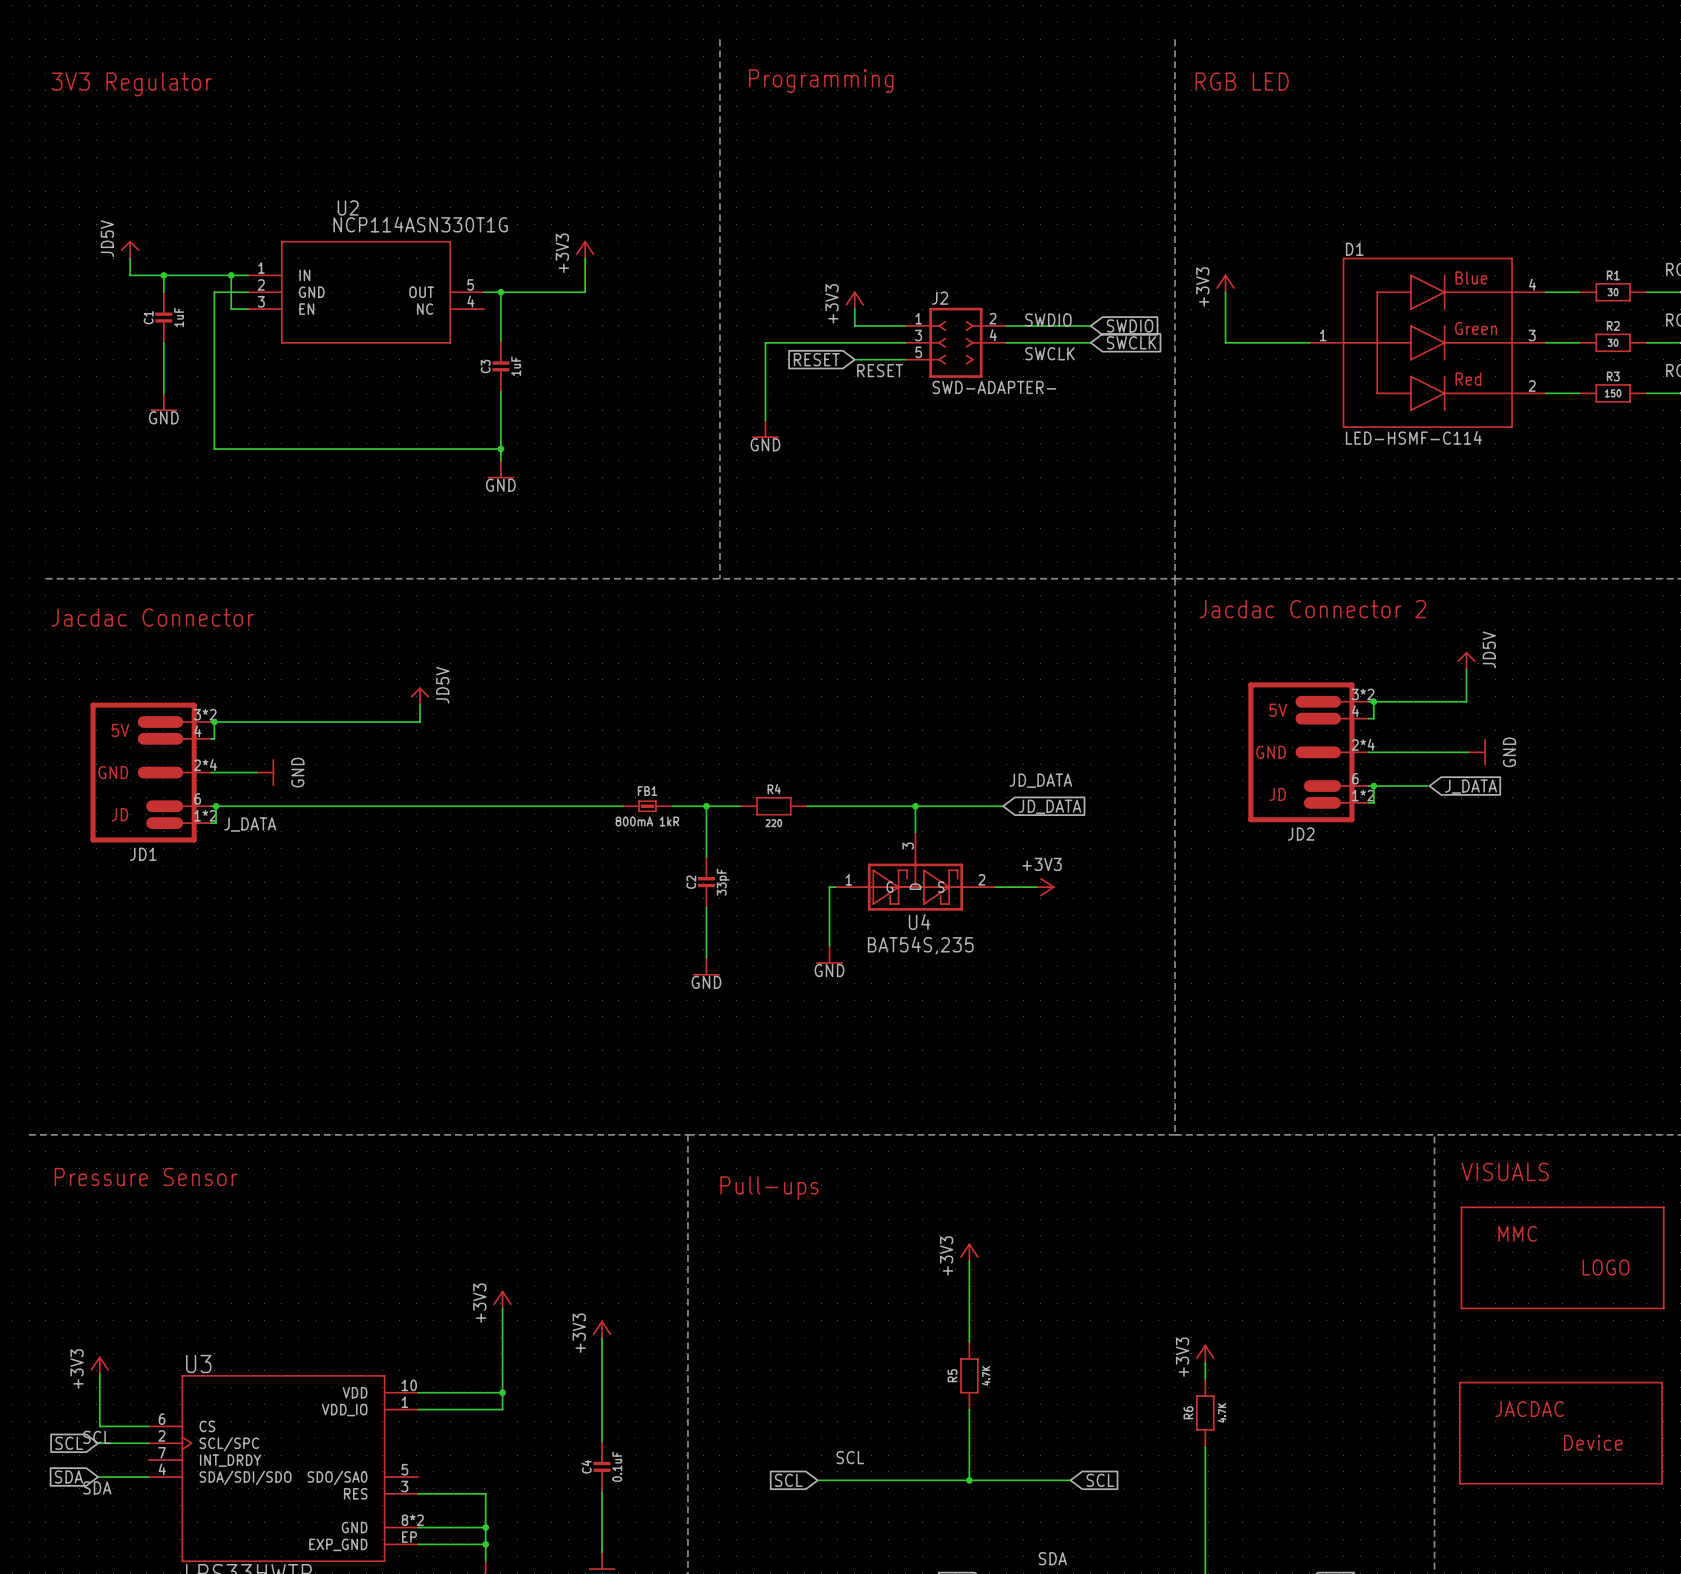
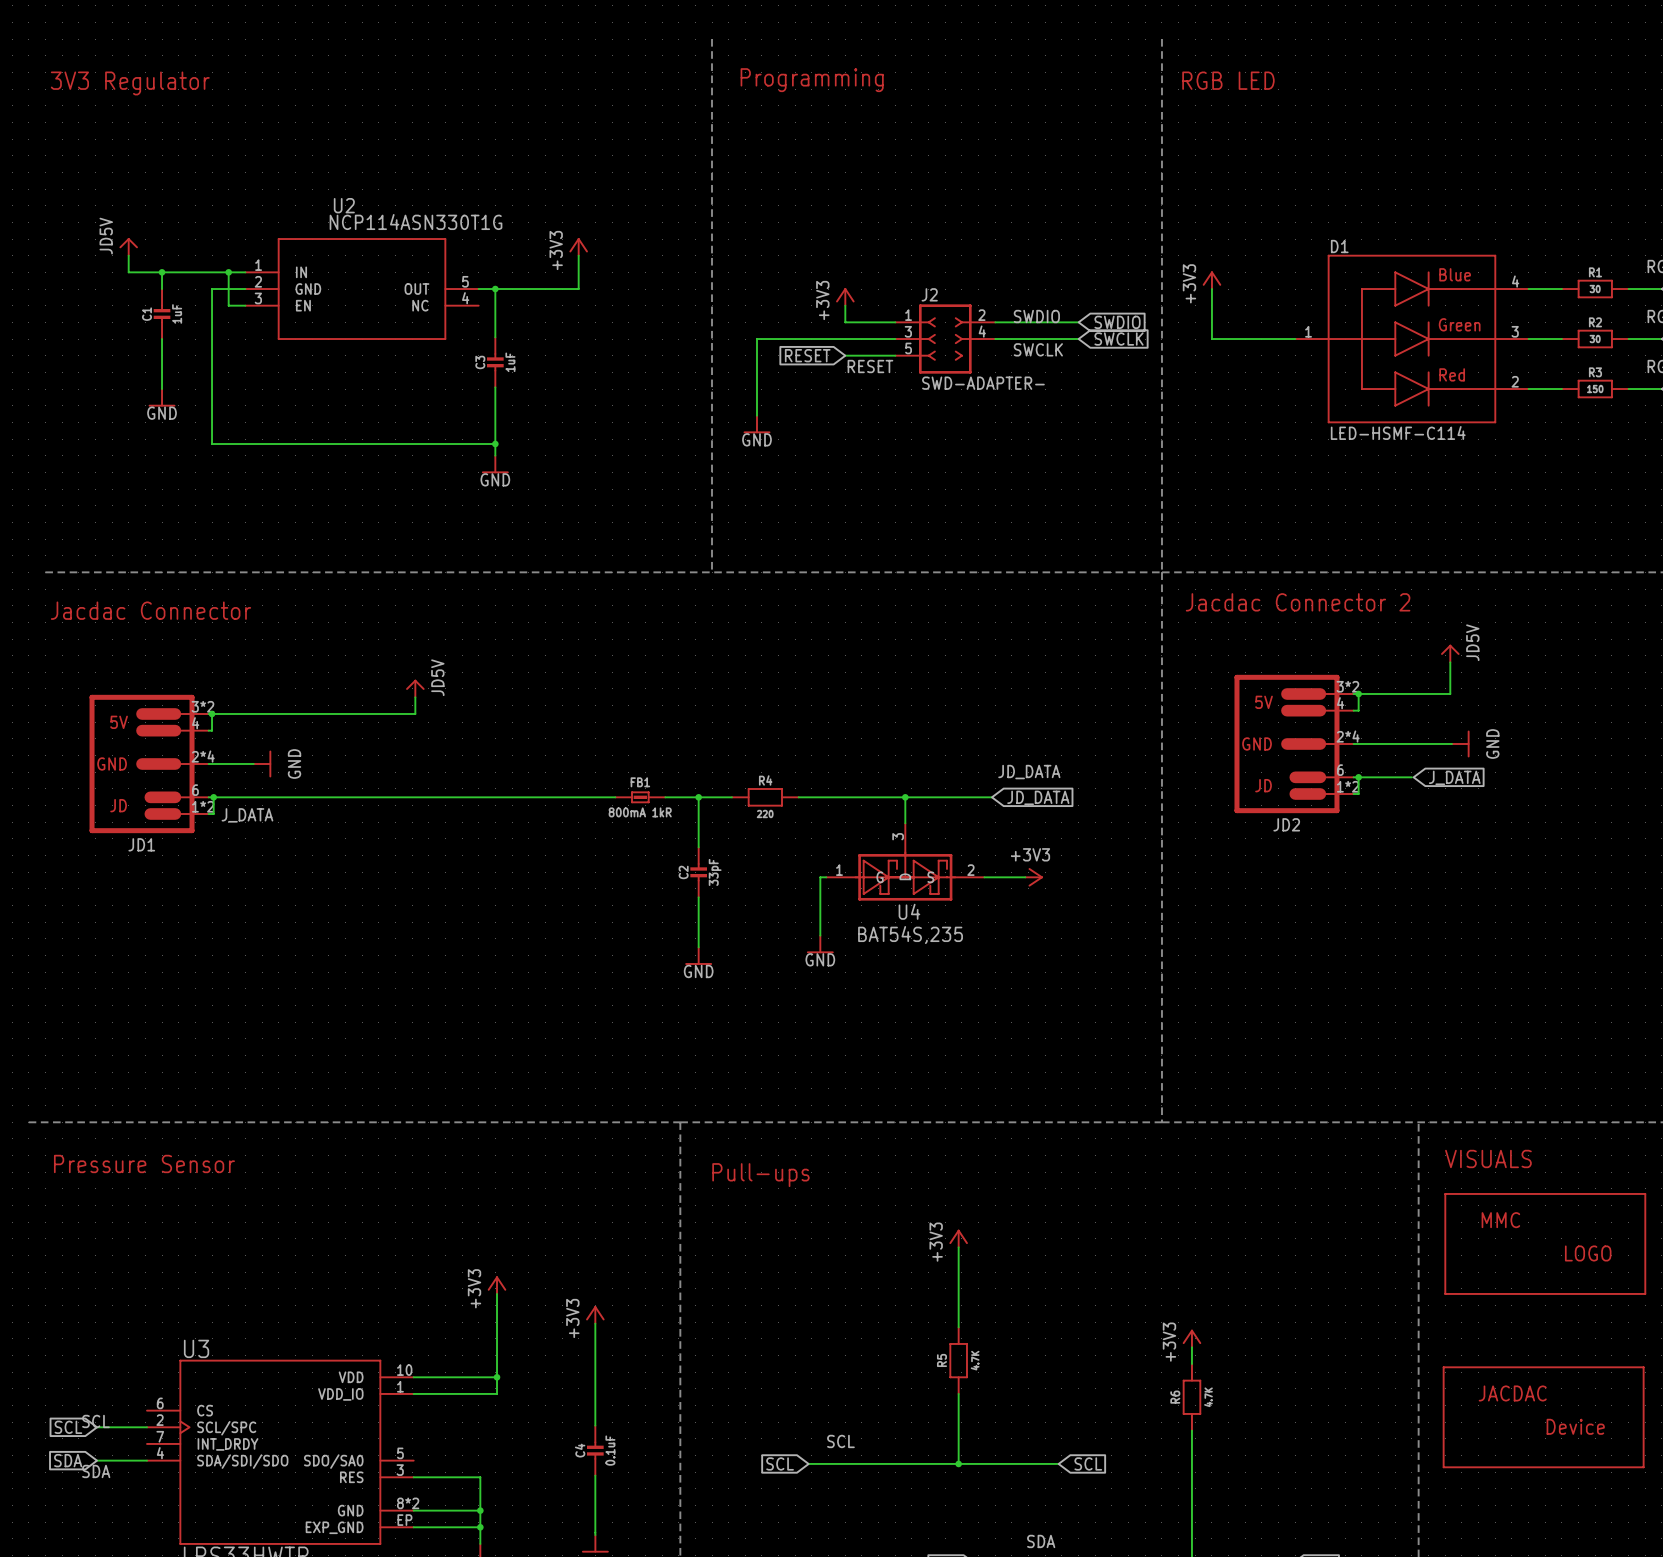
power symbol: +3V3 (99, 1365) -> none
wire: (99, 1374) (99, 1426) (148, 1426) -> none

